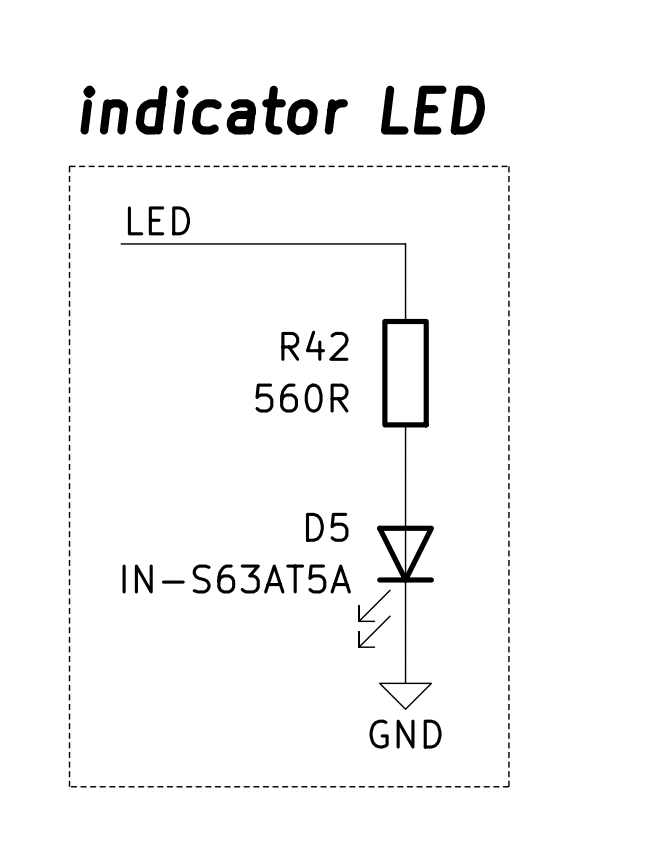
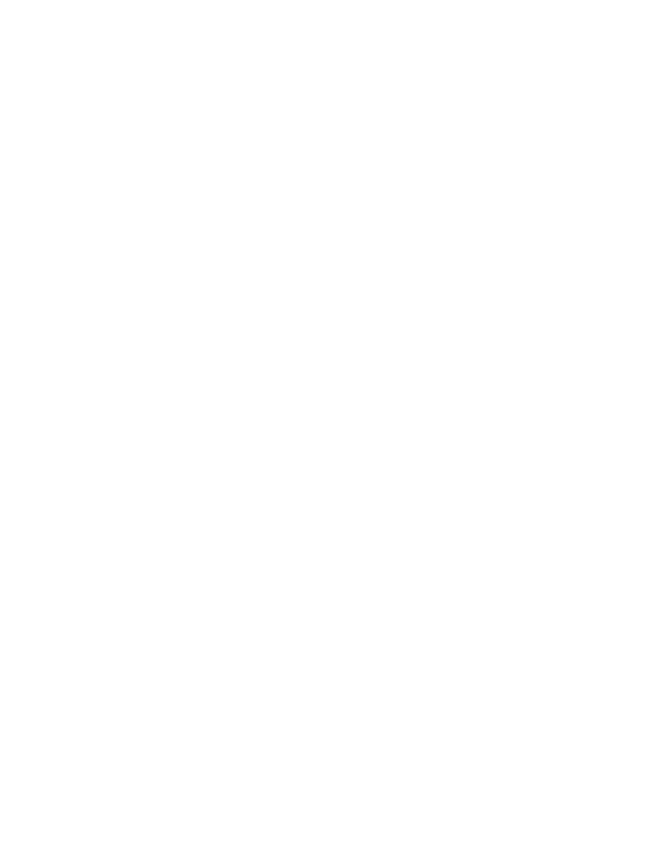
text: indicator LED (282, 110) -> none
line: (69, 166) (508, 166) (508, 786) (69, 786) (69, 166) -> none
label: LED (158, 220) -> none
wire: (121, 243) (405, 243) (405, 295) -> none
R42: 560R (405, 373) -> none
wire: (405, 450) (405, 476) -> none
D5: IN-S63AT5A (396, 561) -> none
wire: (405, 631) (405, 657) -> none
power symbol: GND (405, 683) -> none

